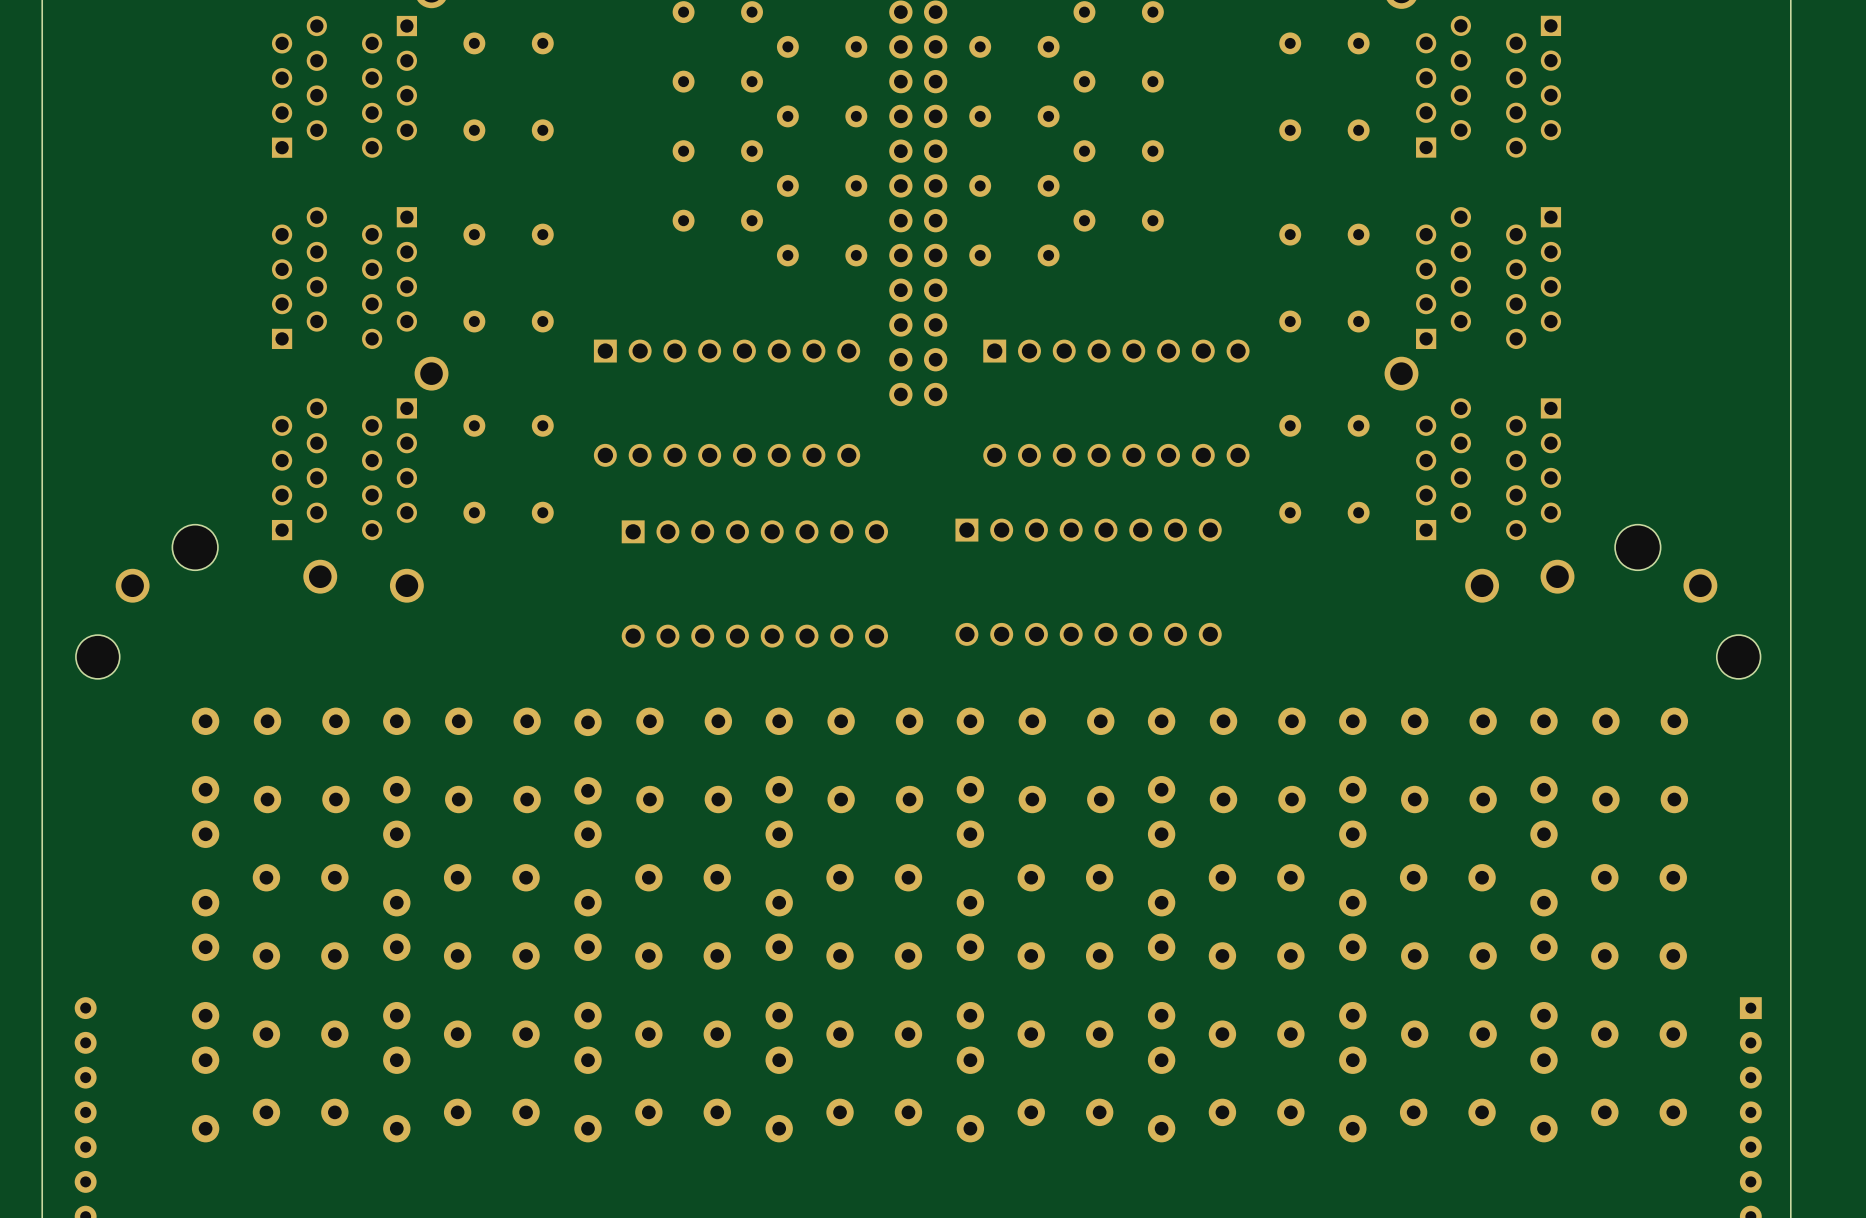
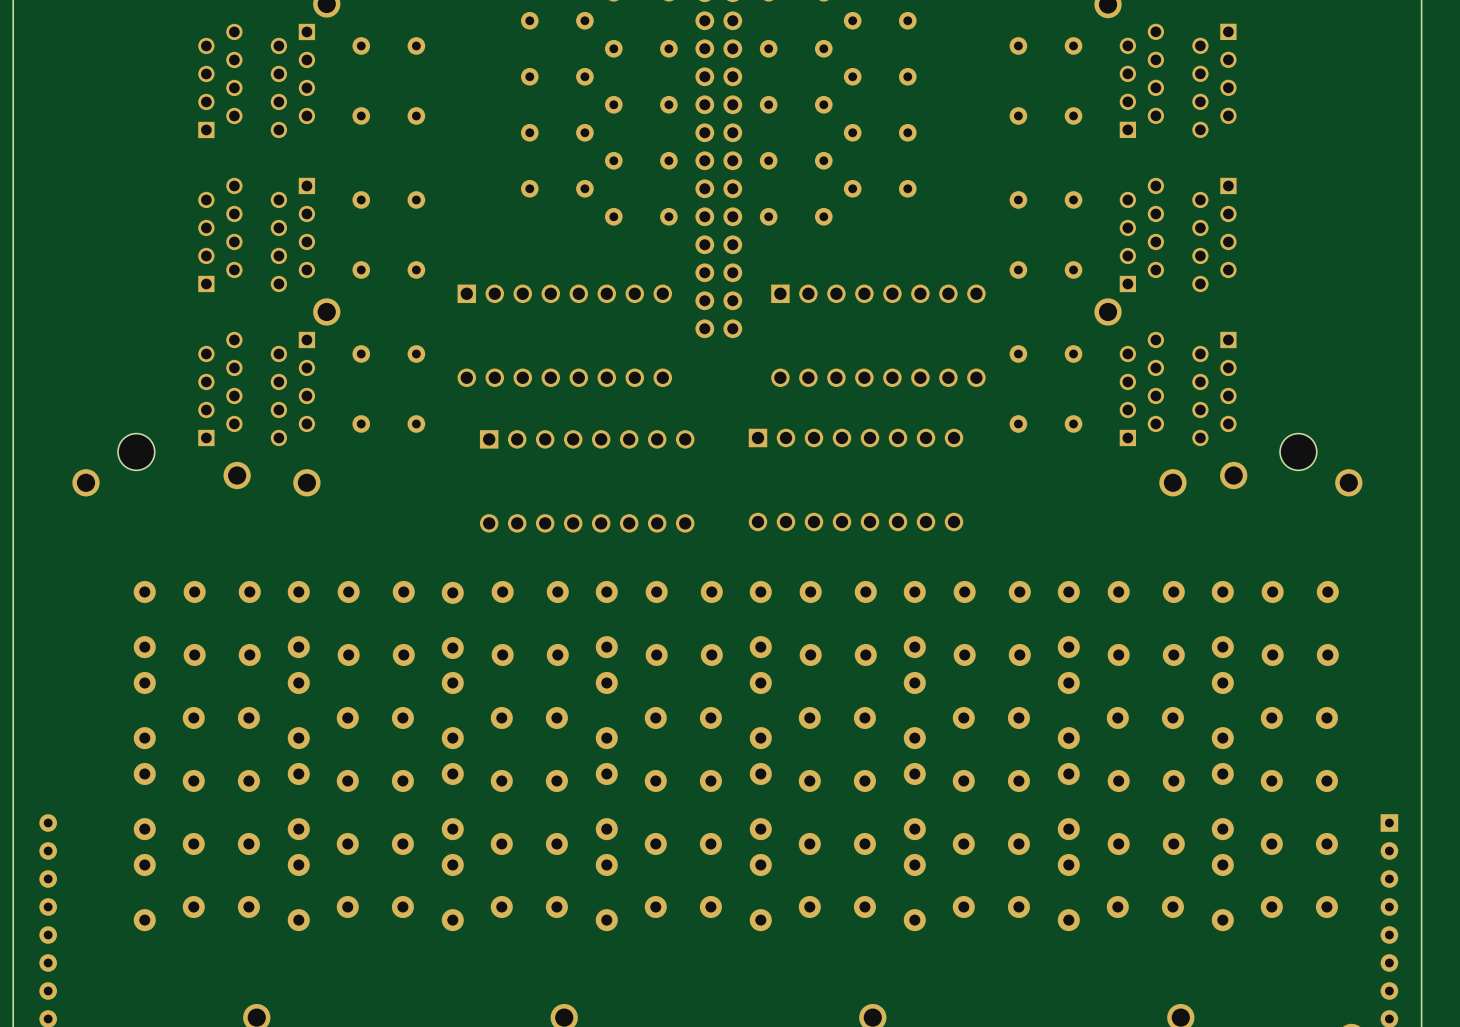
part: (97, 656) -> none
part: (1738, 656) -> none

